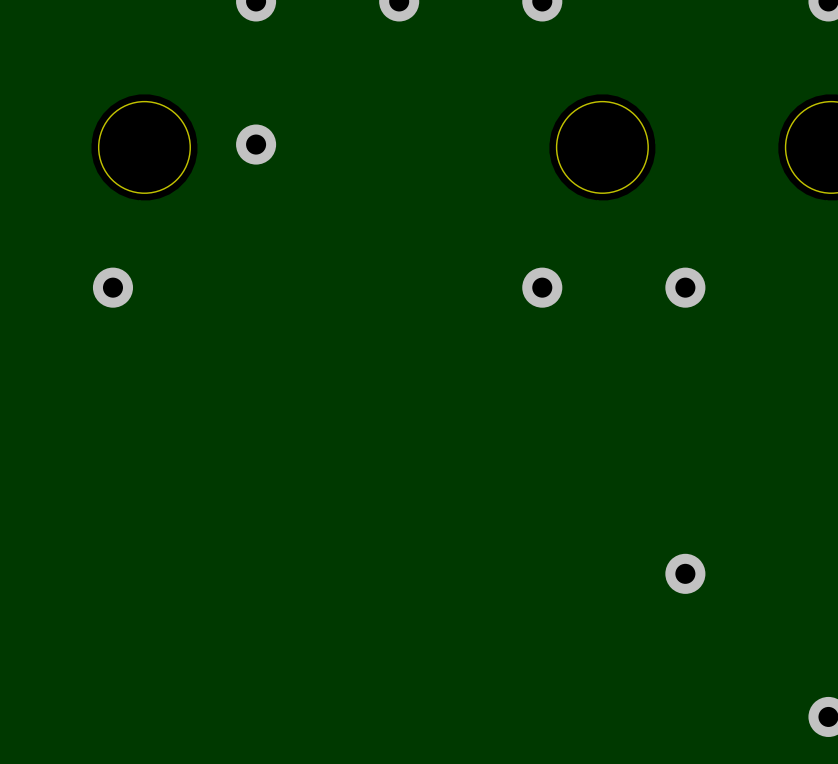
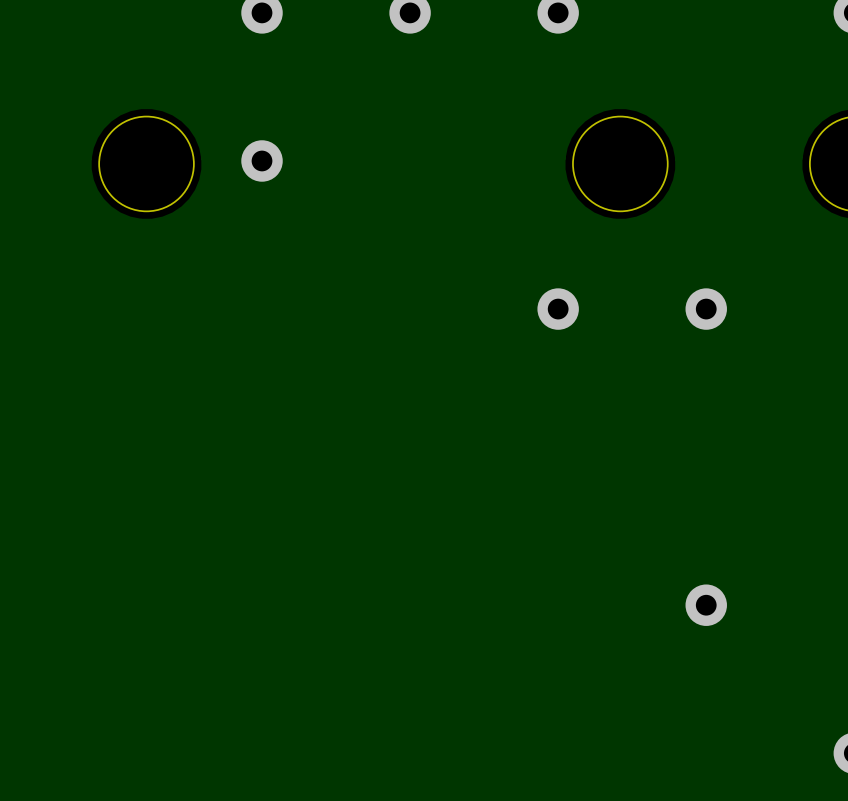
via: (112, 287) -> none

